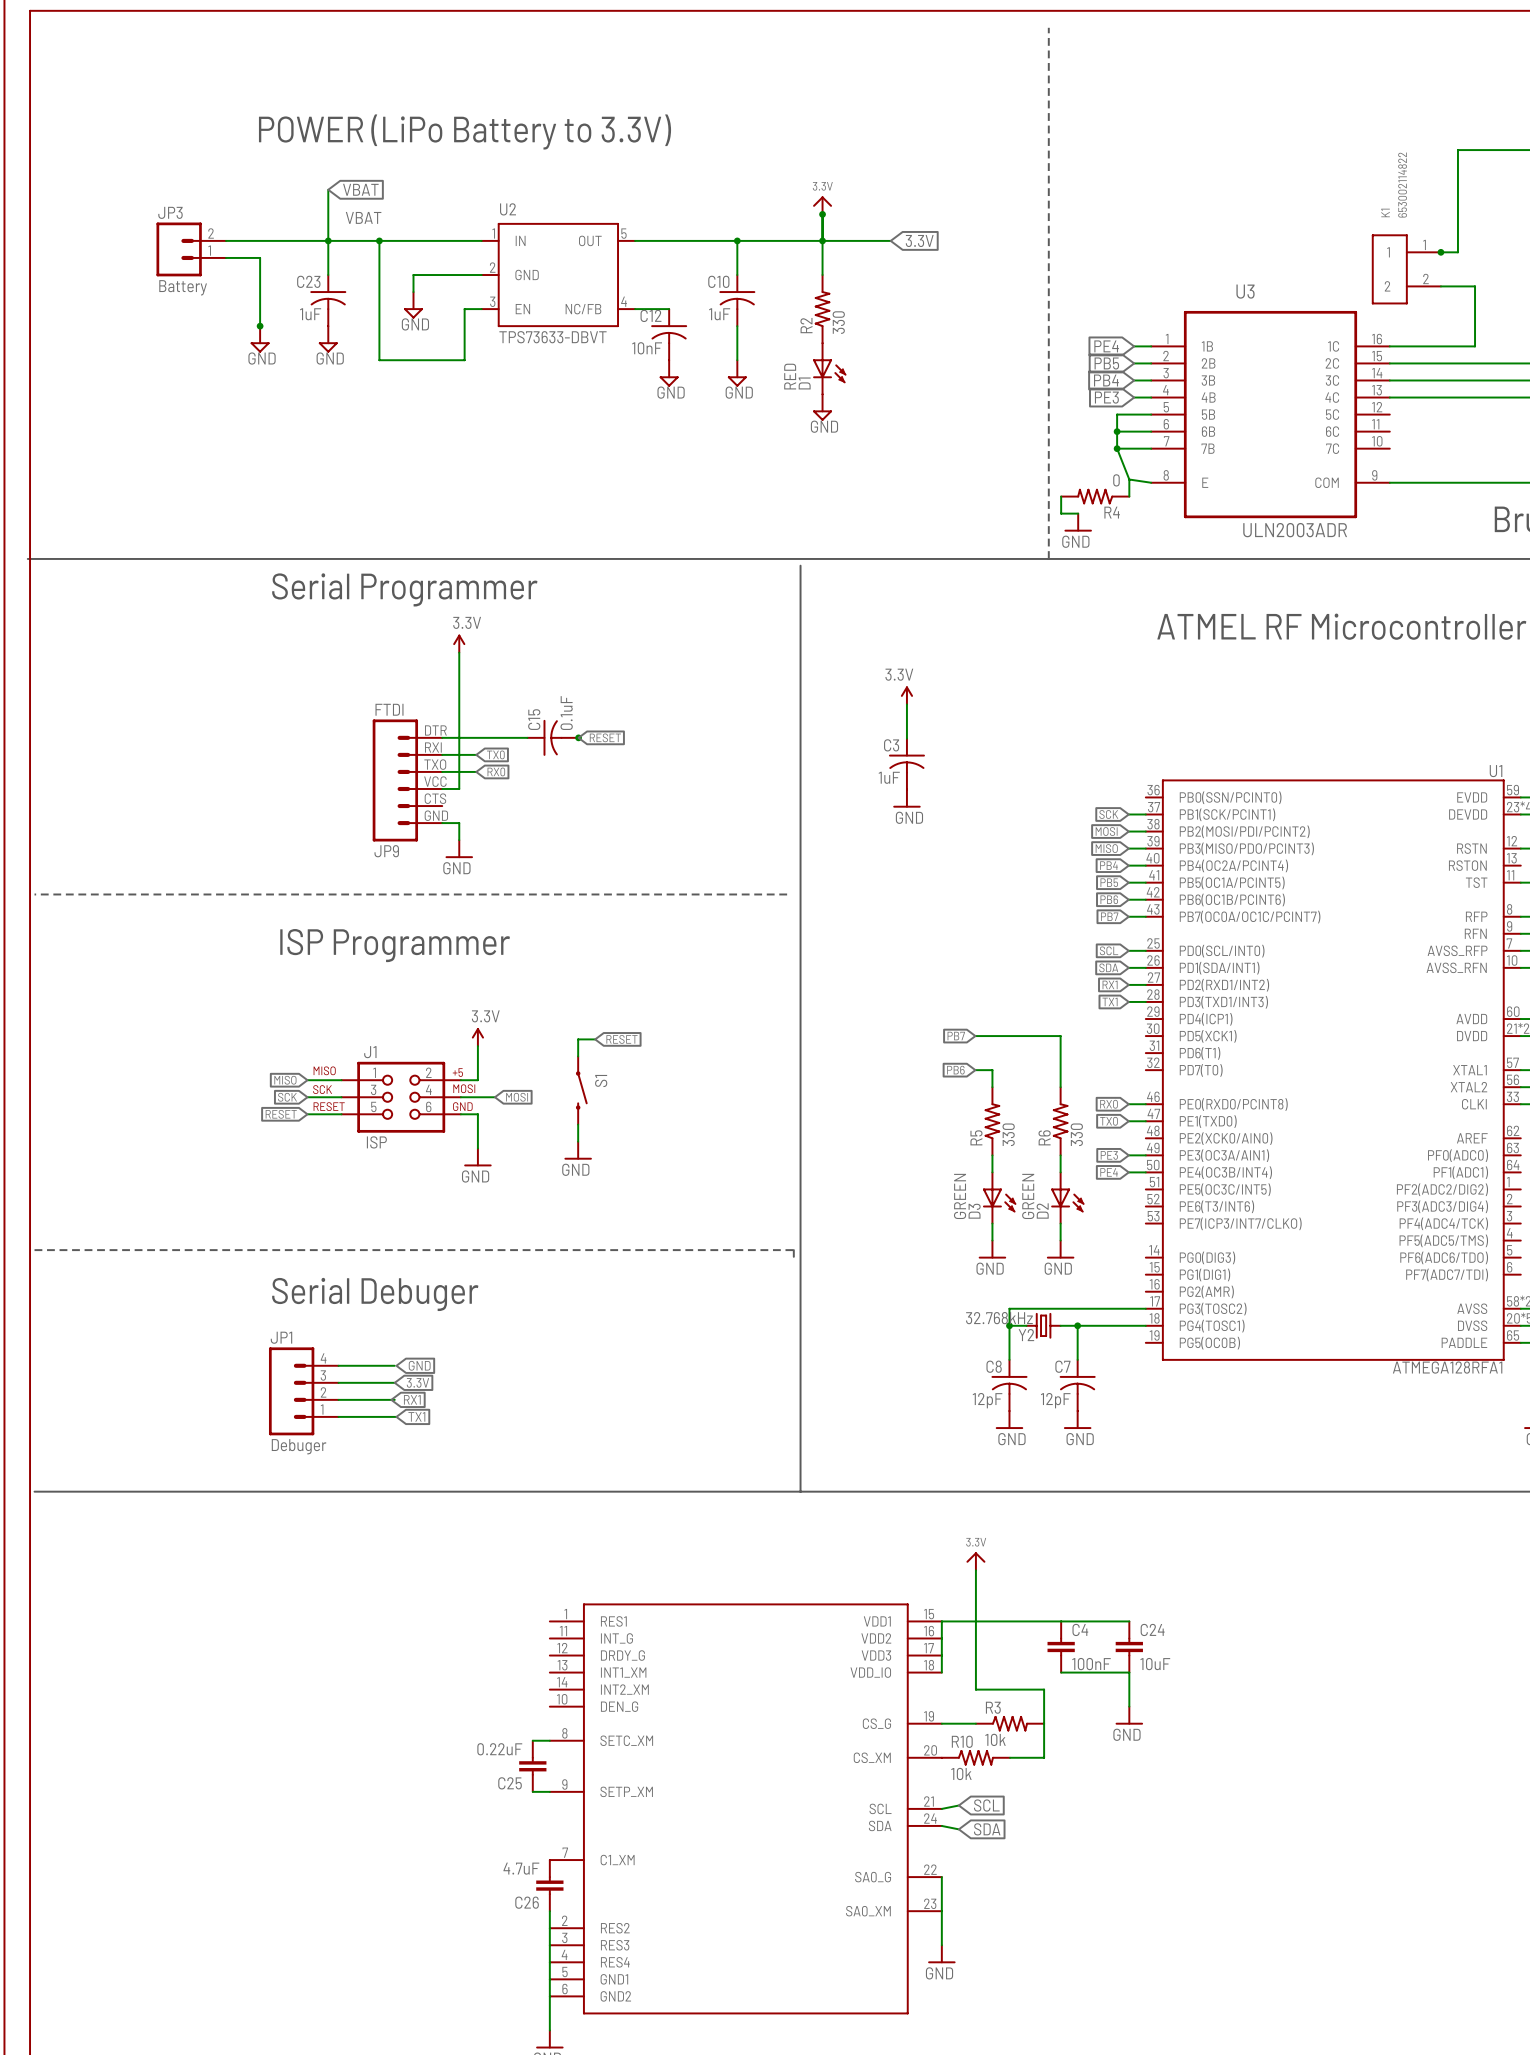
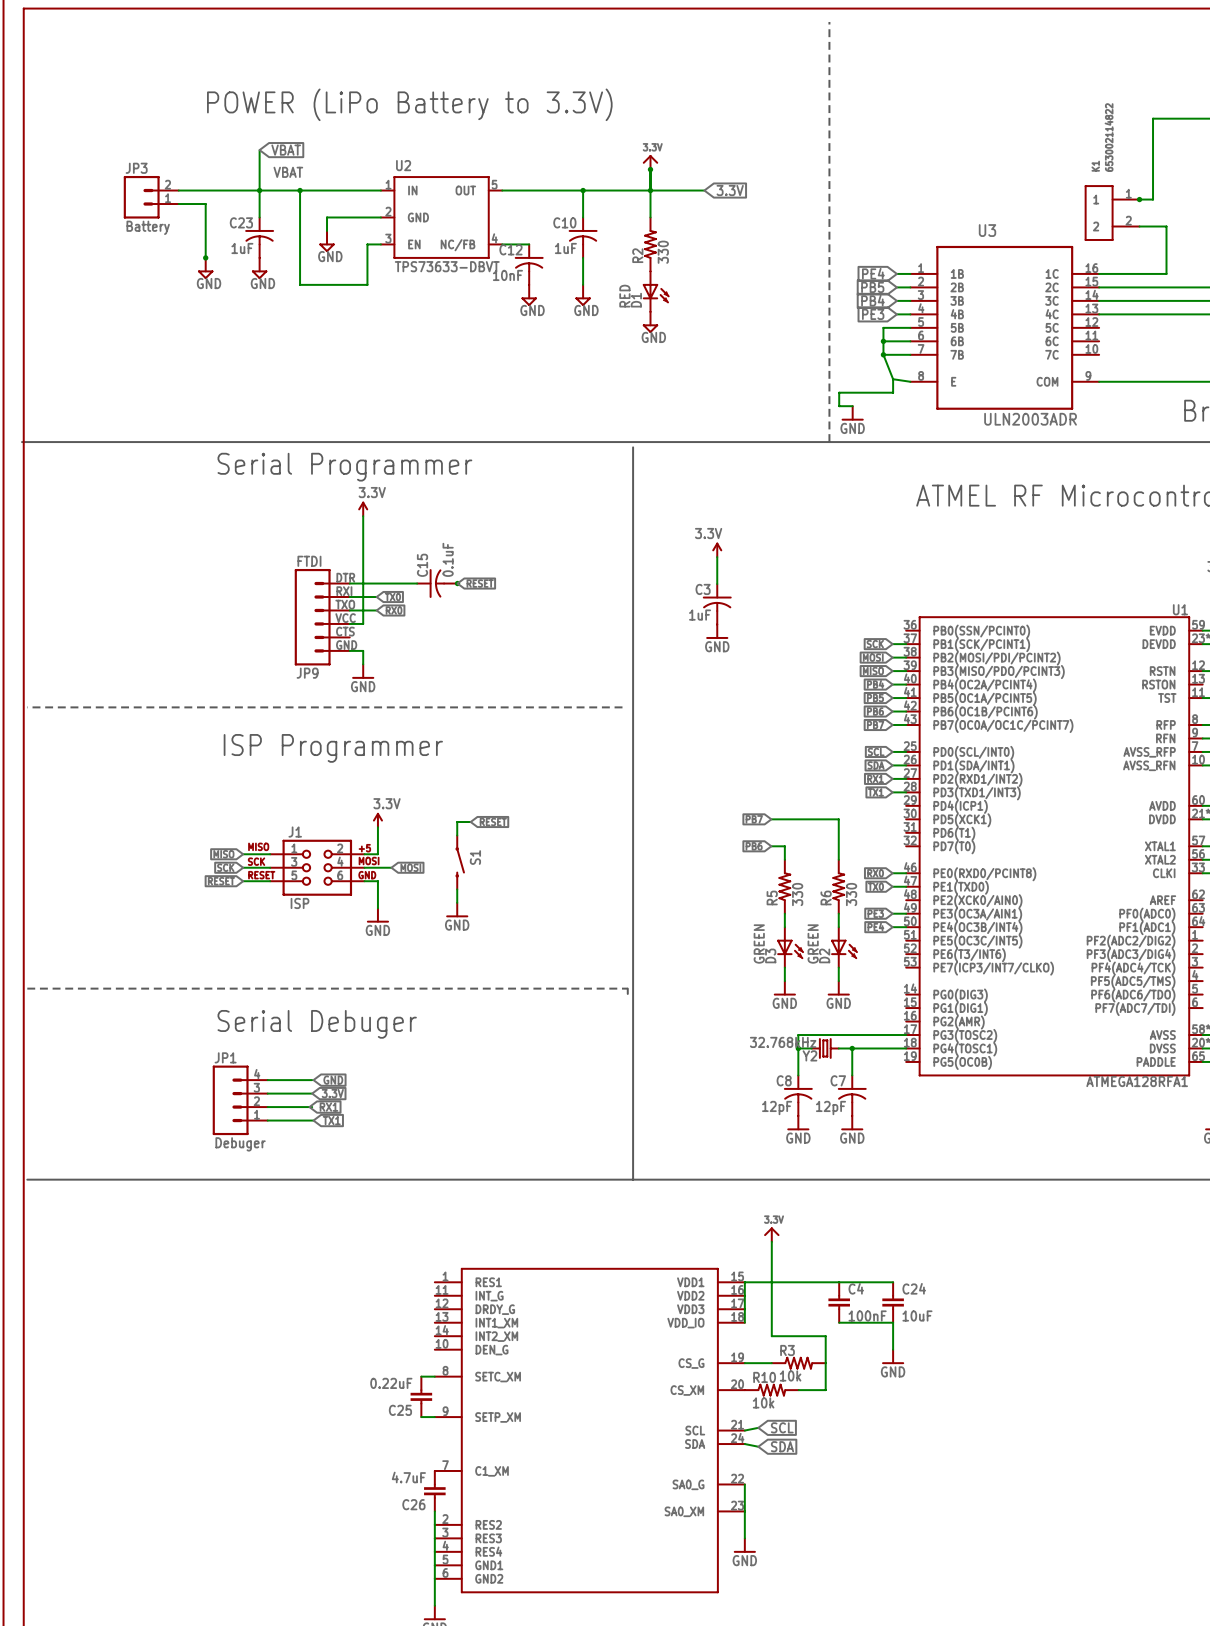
R4: 0 (1095, 496) -> none

